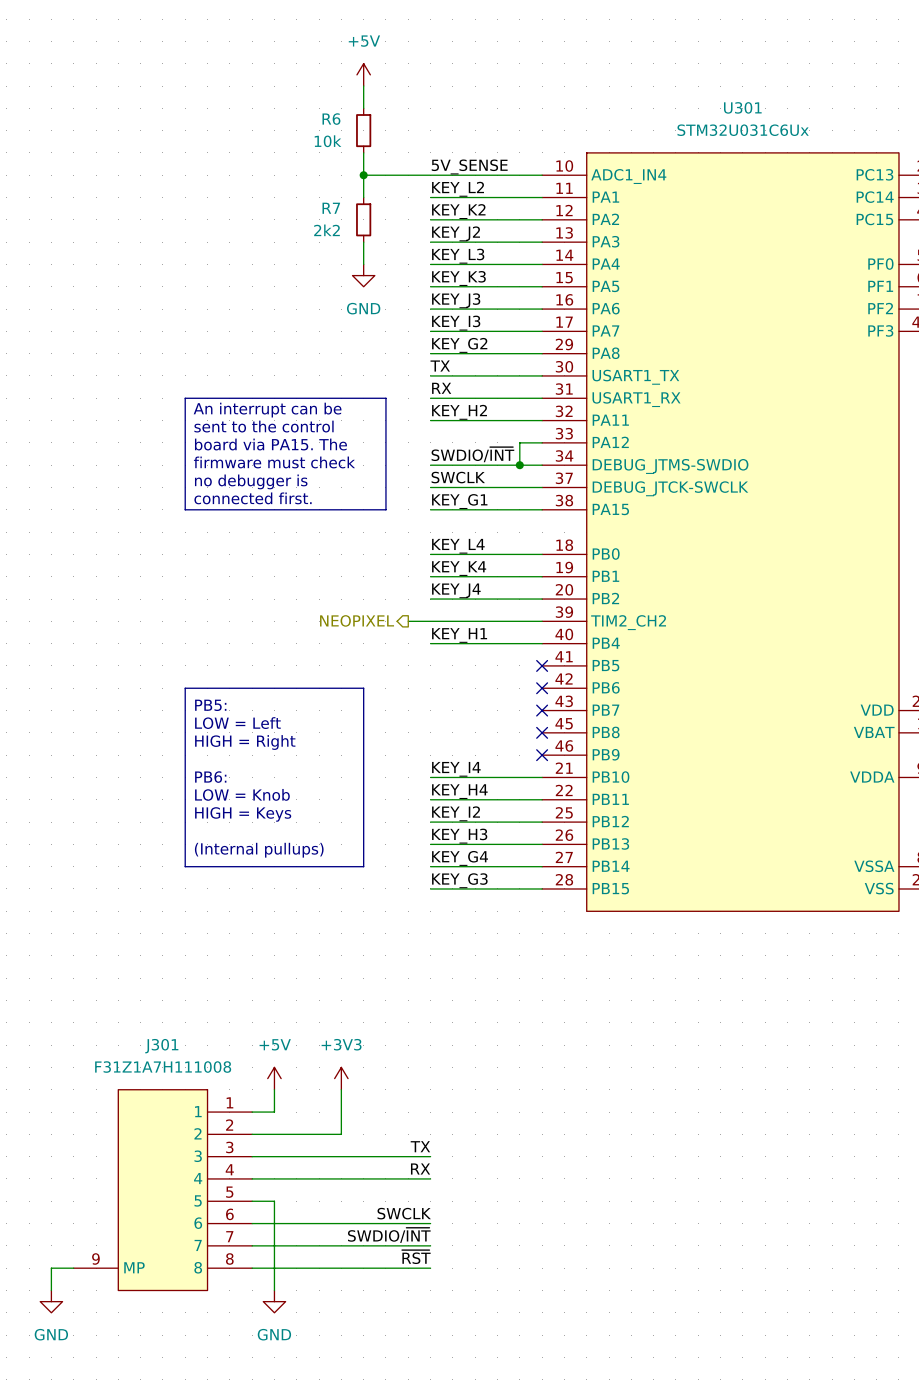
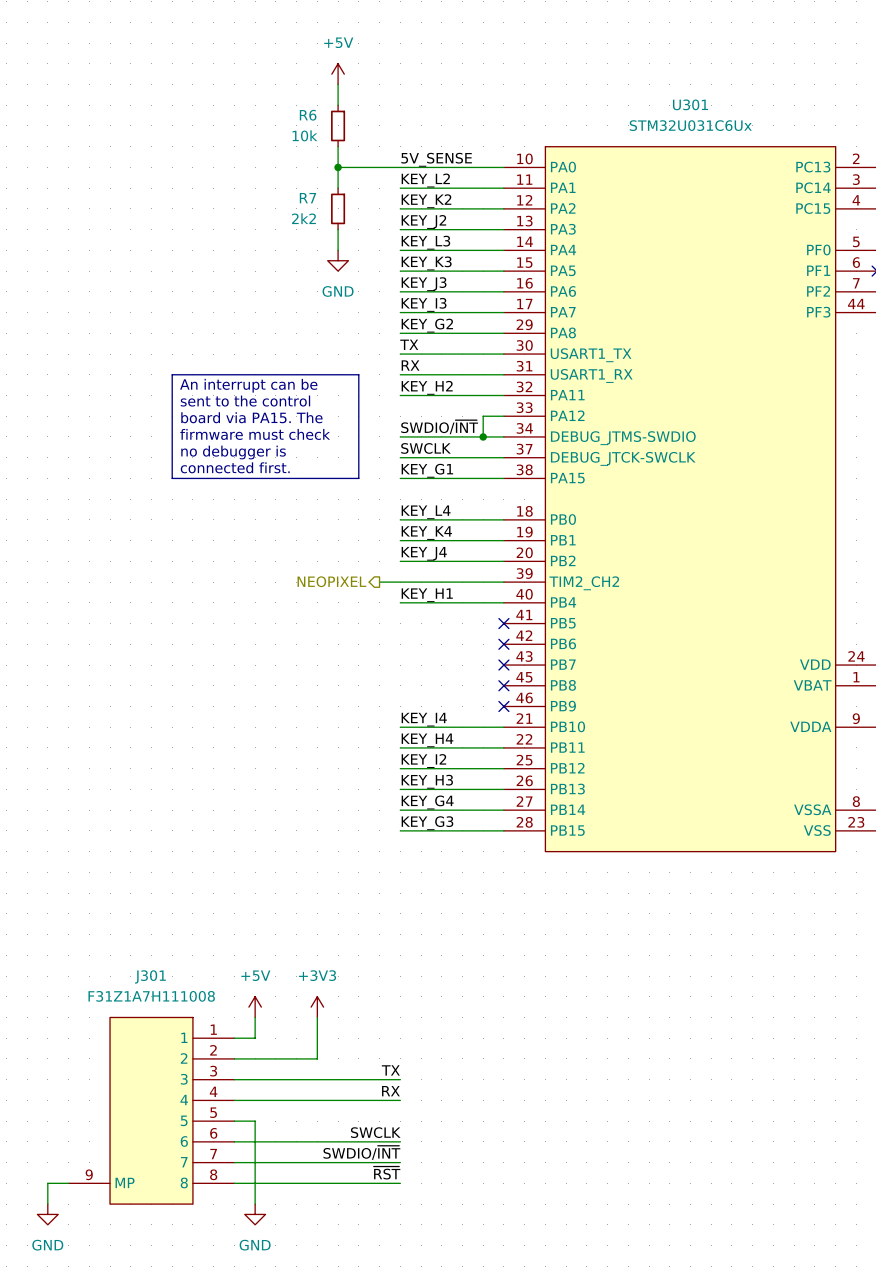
U301 pin name: ADC1_IN4 (628, 176) -> PA0 (563, 167)
line: (185, 688) (363, 688) (363, 866) (185, 866) (185, 688) -> none
text: PB5: (210, 705) -> none
text: LOW = Left (237, 723) -> none
text: HIGH = Right (245, 742) -> none
text: PB6: (210, 777) -> none
text: LOW = Knob (242, 794) -> none
text: HIGH = Keys (243, 814) -> none
text: (Internal pullups) (259, 850) -> none

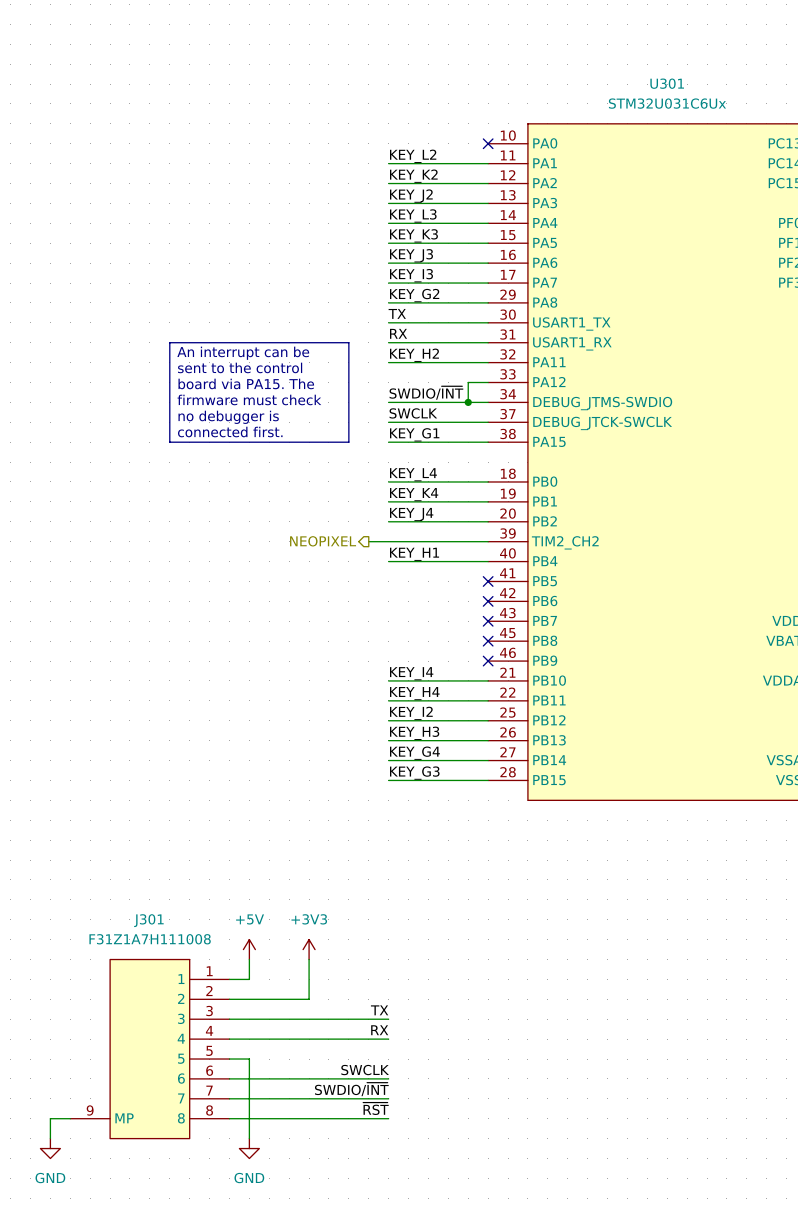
power symbol: +5V (338, 74) -> none
wire: (338, 84) (338, 105) -> none
R6: 10k (338, 125) -> none
wire: (338, 146) (338, 188) -> none
label: 5V_SENSE (436, 159) -> none
wire: (338, 167) (503, 167) -> none
junction: (338, 167) -> none
no-connect mark: none -> (488, 143)
R7: 2k2 (338, 208) -> none
wire: (338, 229) (338, 250) -> none
power symbol: GND (338, 260) -> none

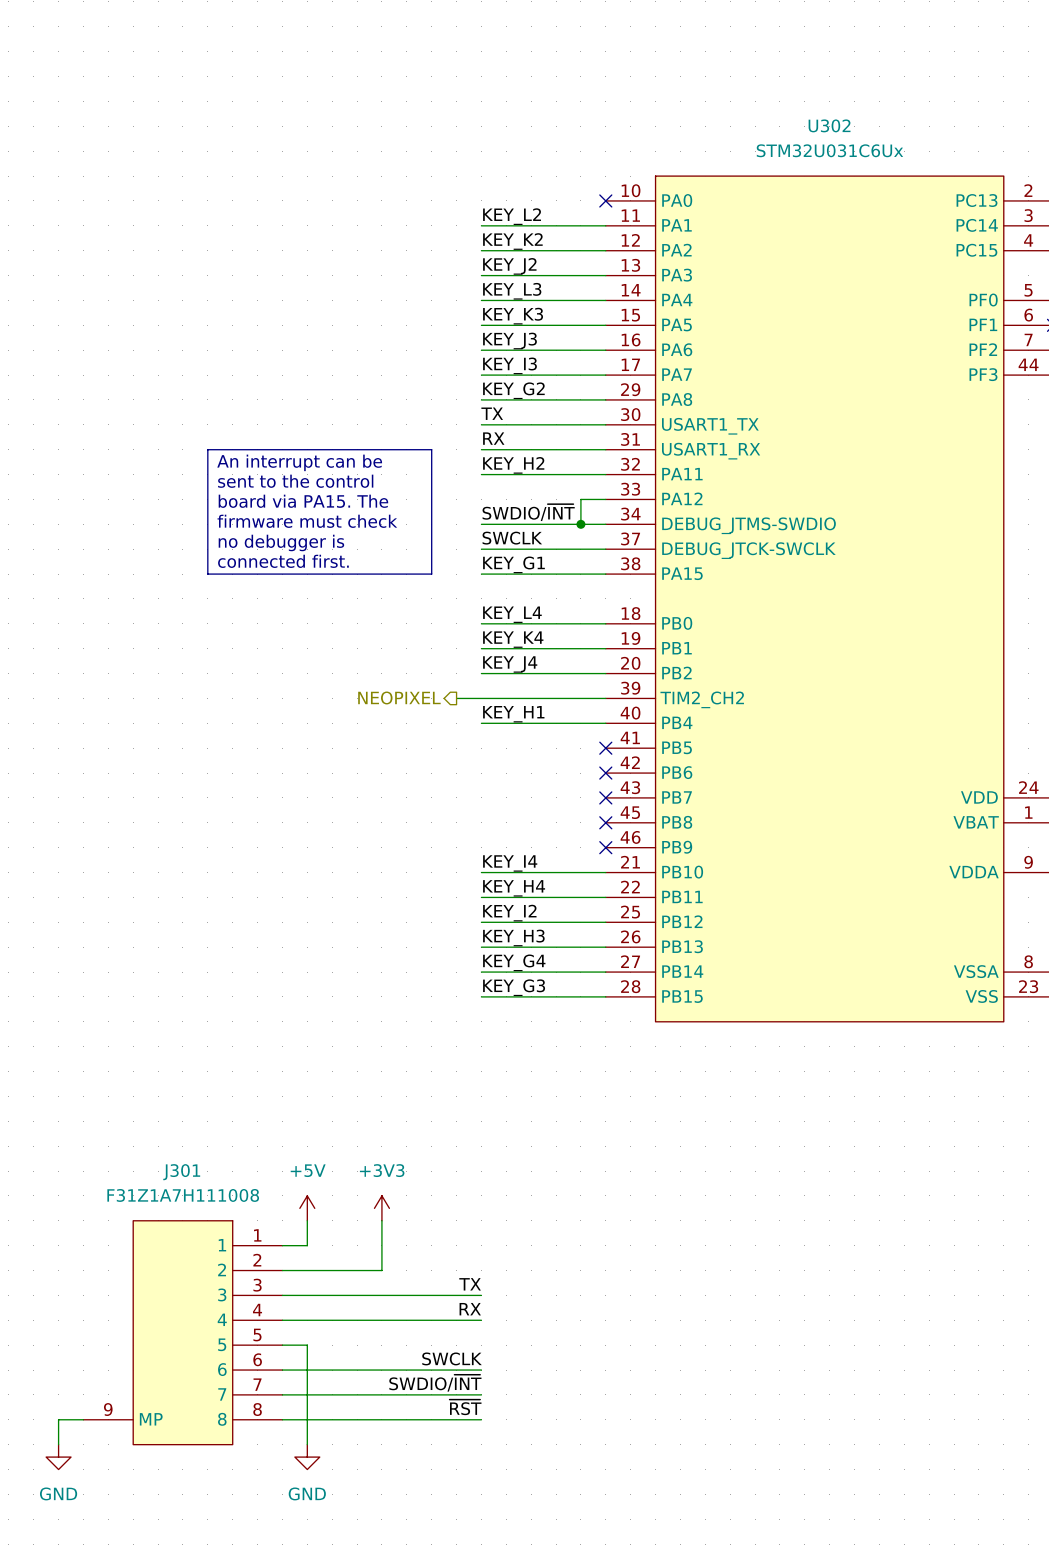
U301 name: U301 (667, 83) -> U302 (829, 125)

